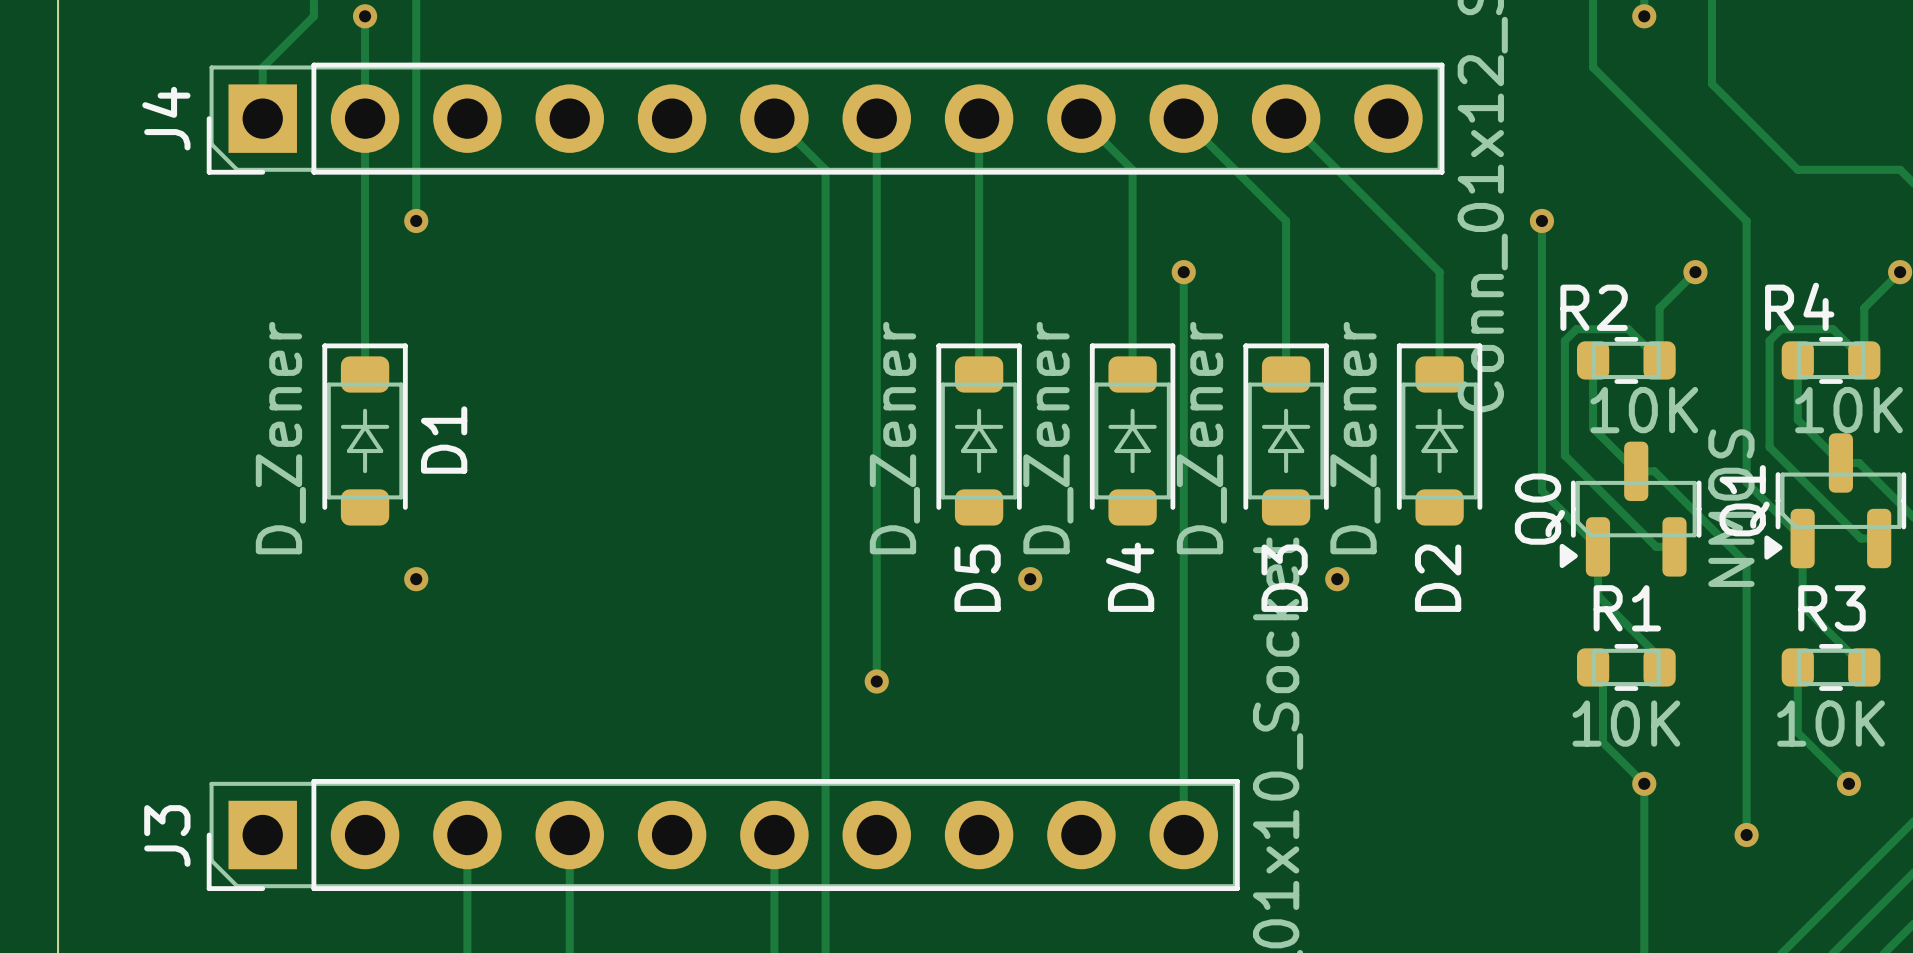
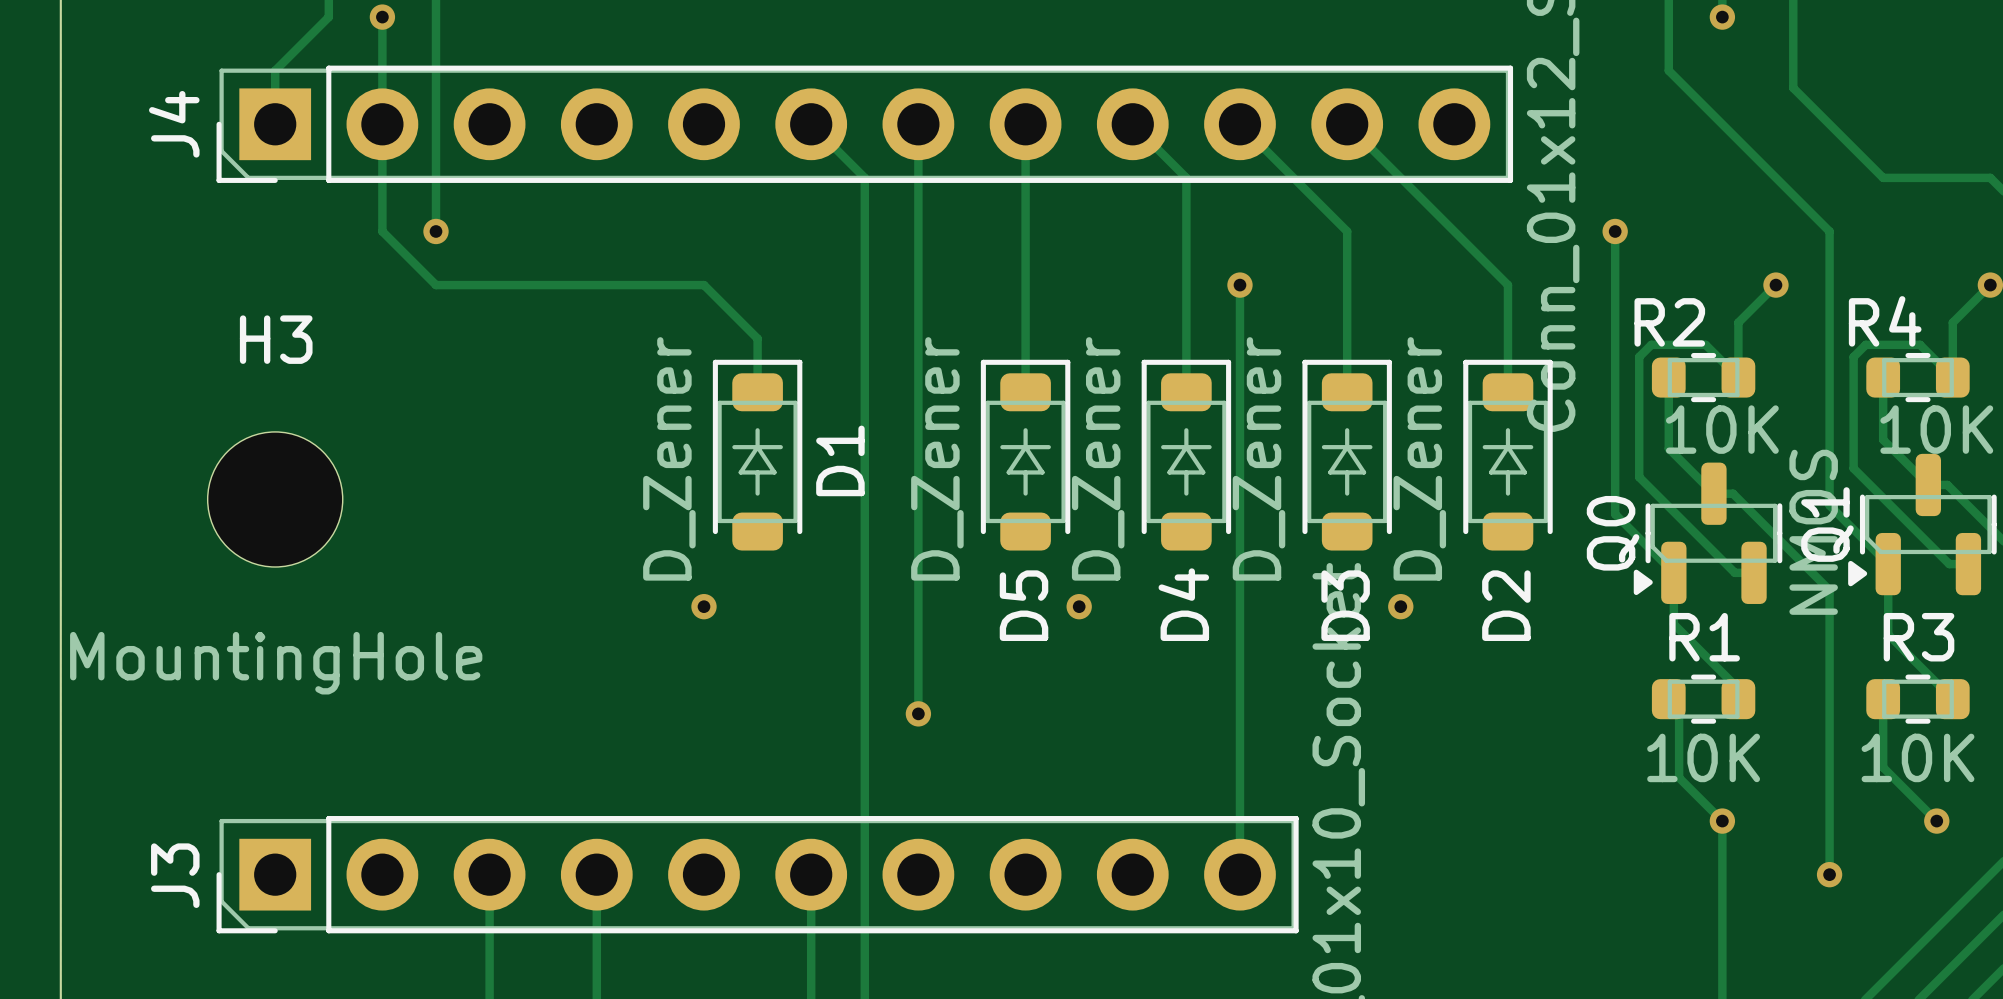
track: (365, 220) (365, 374) -> (382, 231) (436, 285) (703, 285) (757, 338) (757, 392)
D1 position: (365, 434) -> (757, 455)
H3: none -> MountingHole (275, 499)
via: (416, 579) -> none
via: none -> (703, 606)

